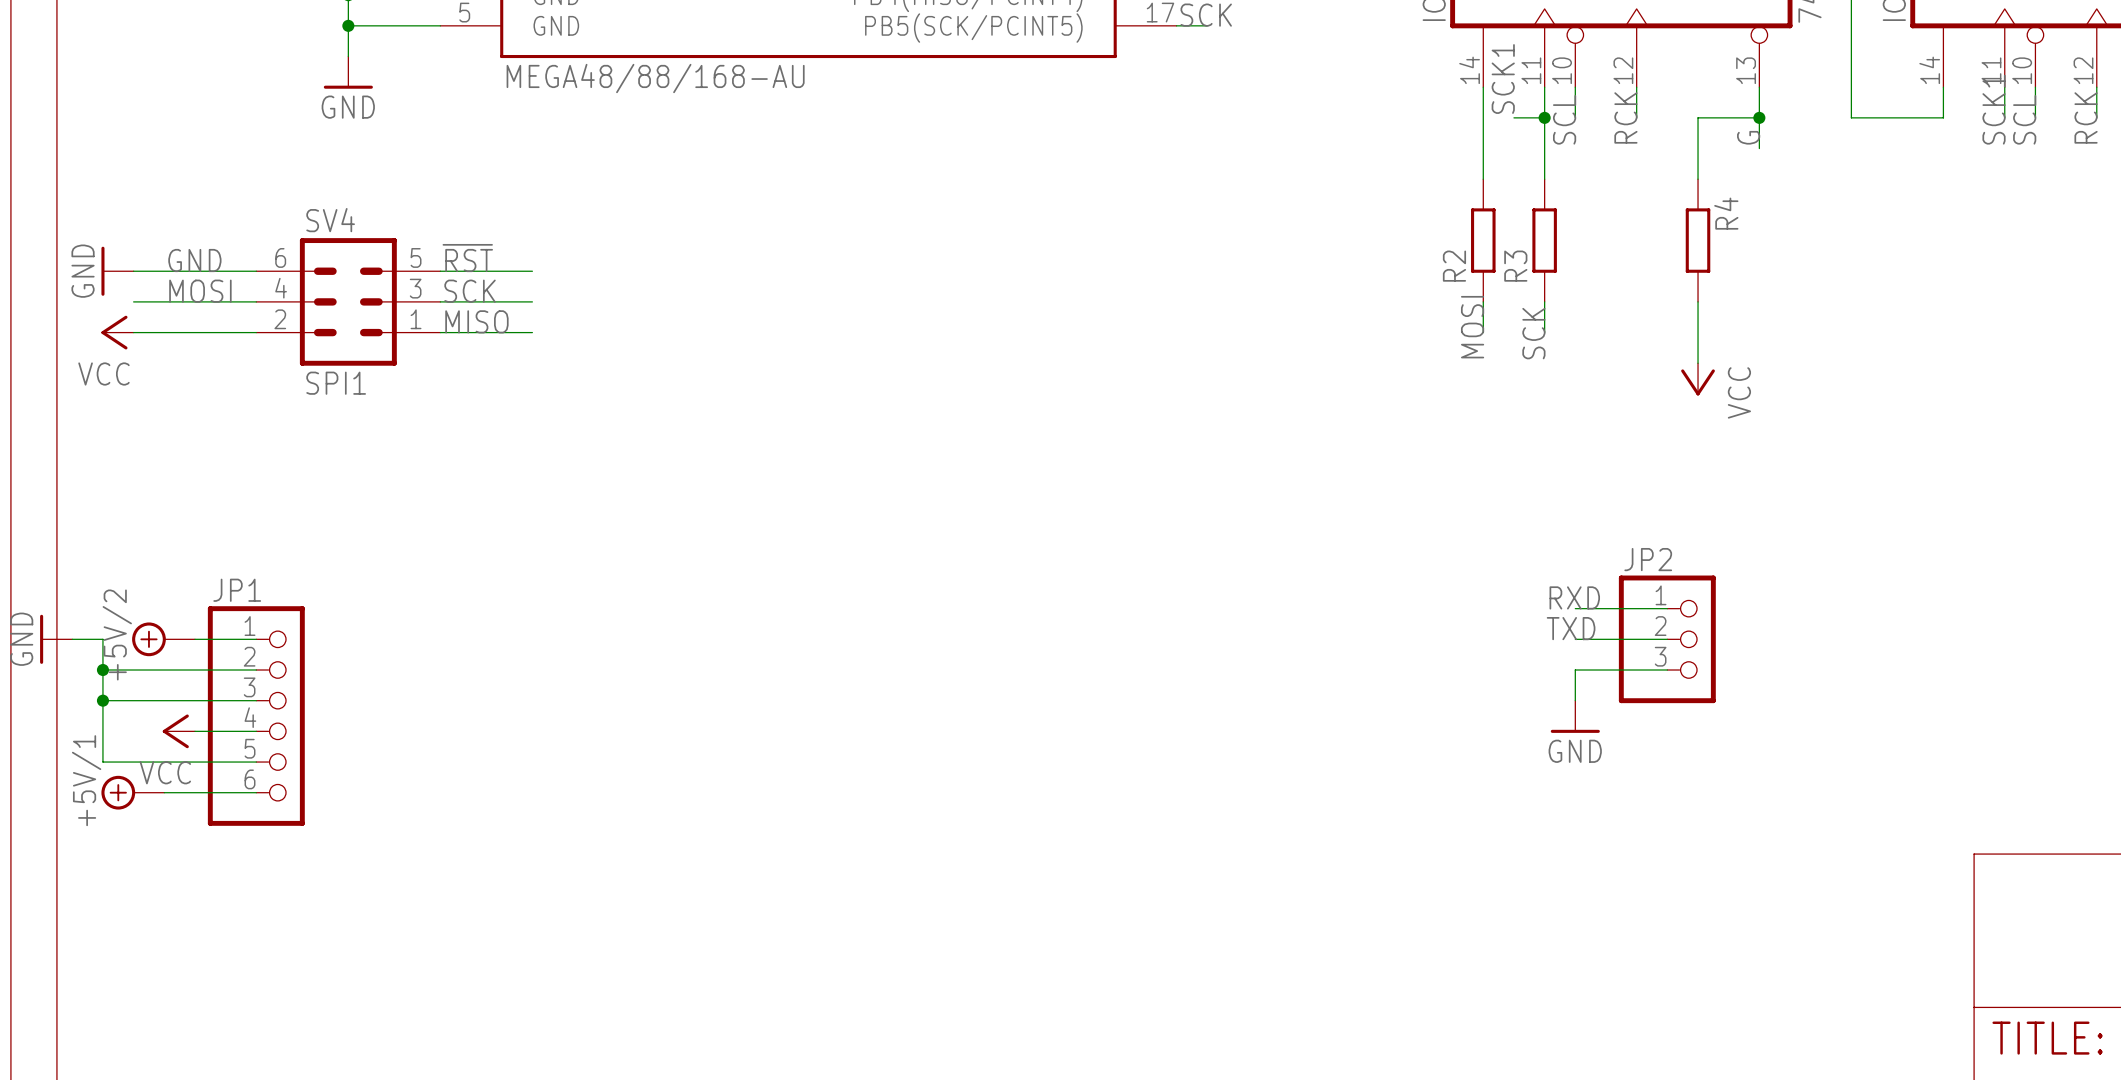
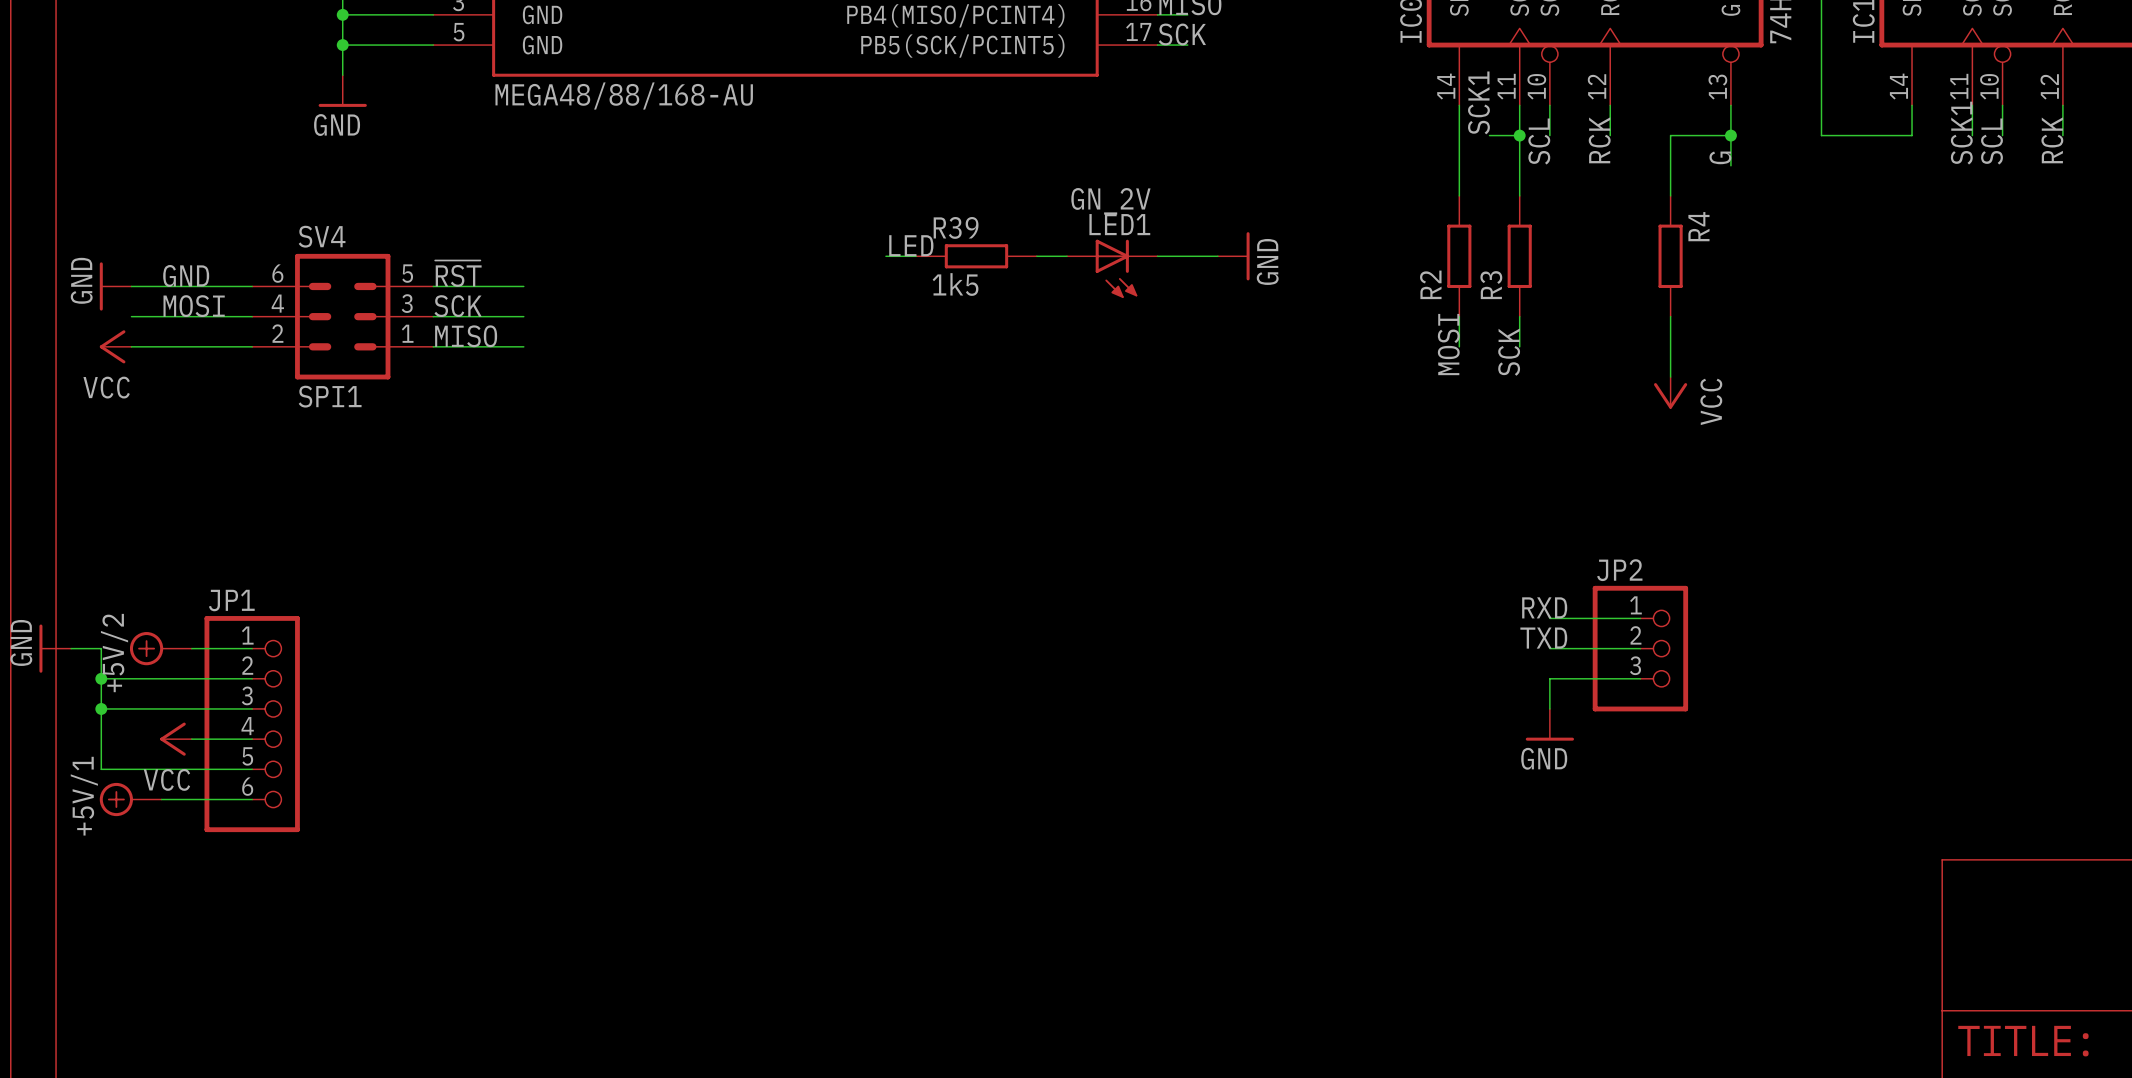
label: none -> LED (911, 245)
wire: none -> (885, 256) (916, 256)
R39: none -> 1k5 (976, 256)
wire: none -> (1036, 256) (1067, 256)
wire: none -> (1157, 256) (1217, 256)
power symbol: none -> GND (1233, 256)
LED1: none -> GN_2V (1112, 268)

